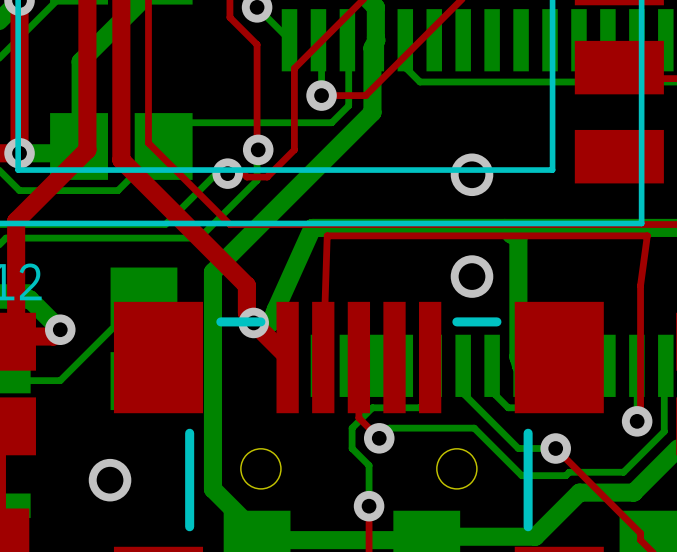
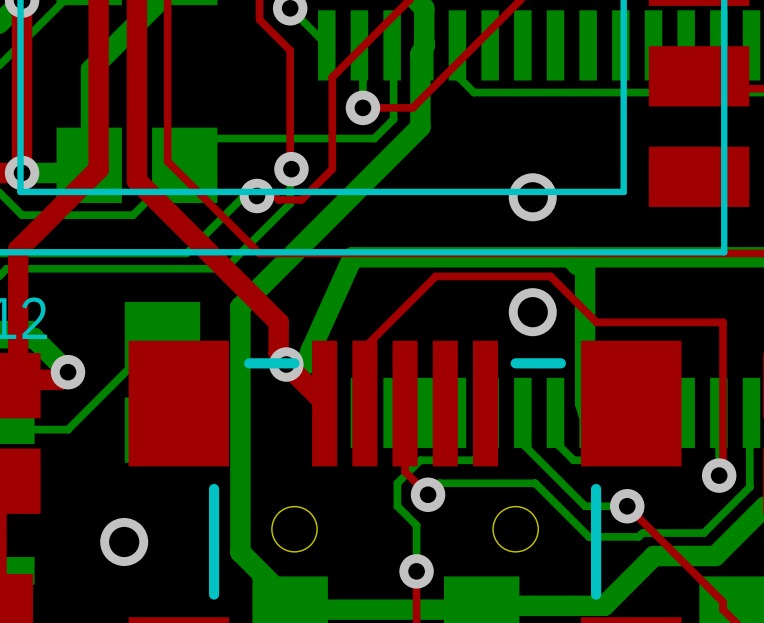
top track: (640, 285) (647, 235) (327, 235) (324, 305) -> (723, 322) (596, 322) (550, 276) (435, 276) (366, 345) (364, 403)

